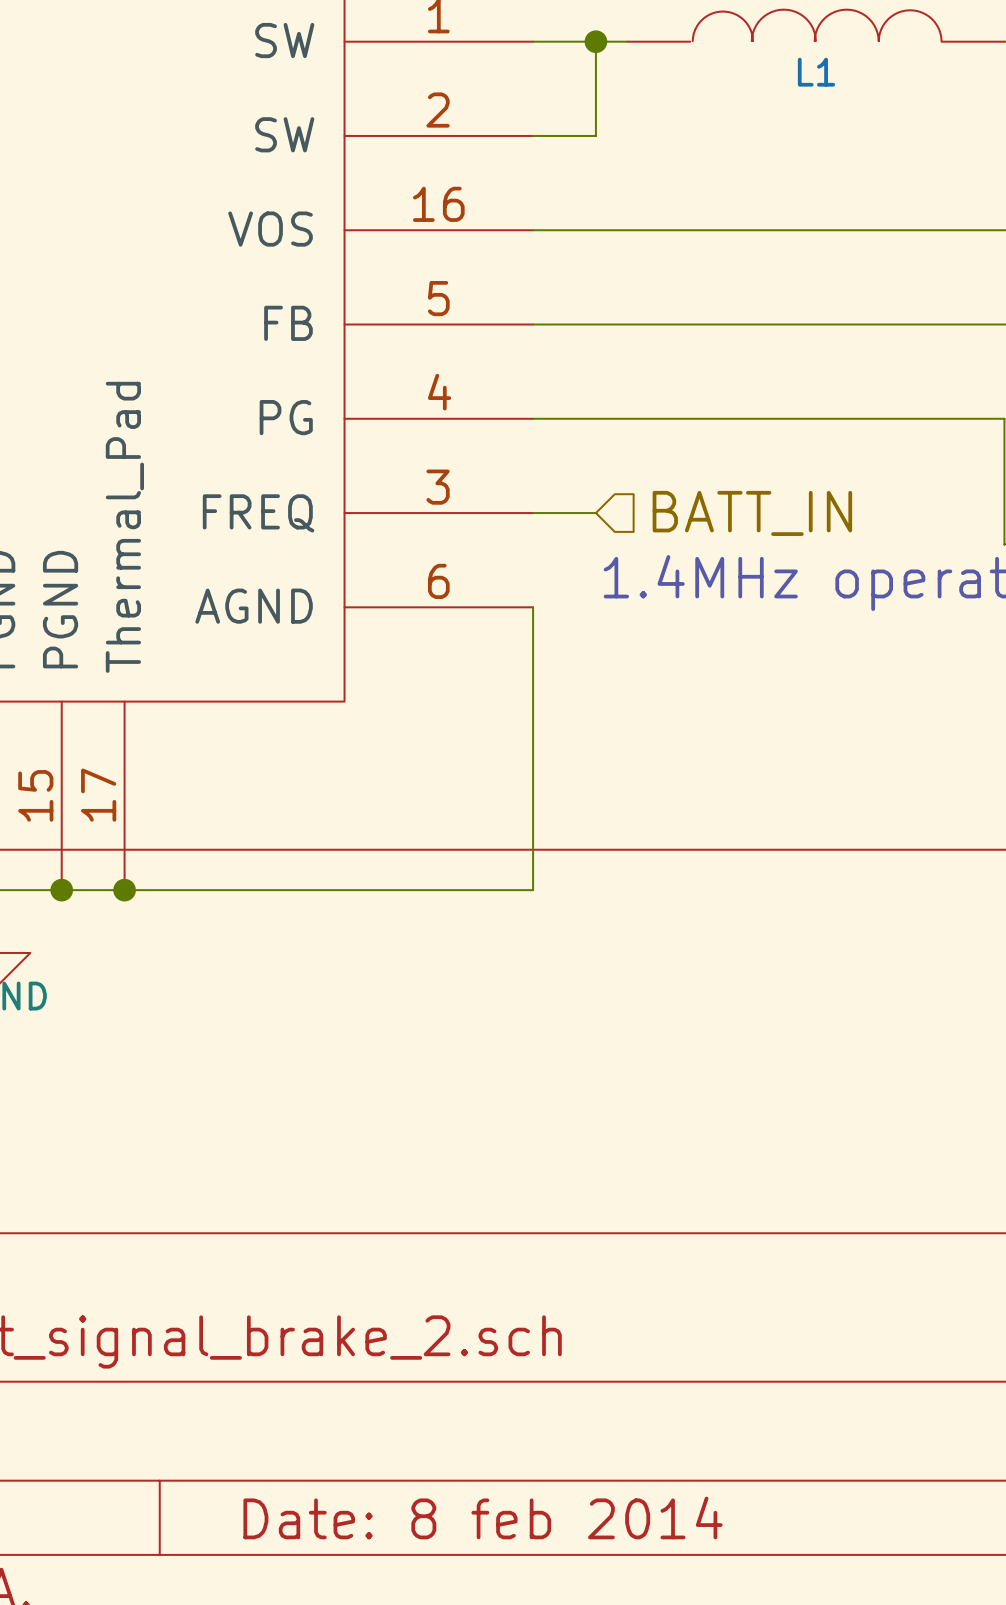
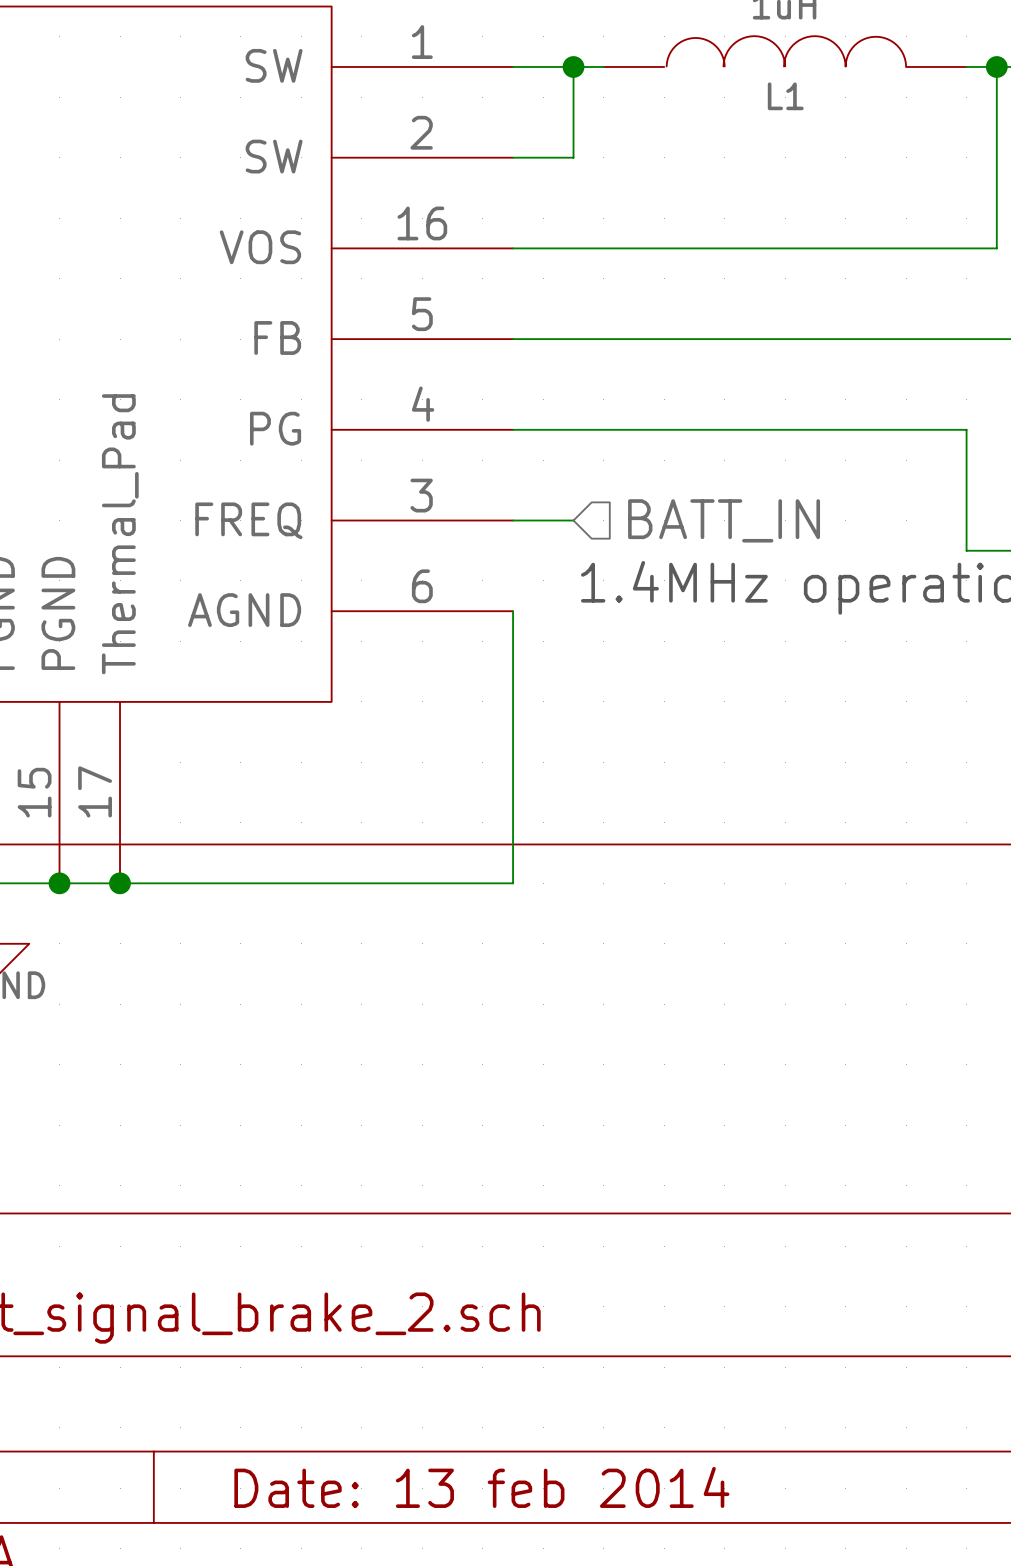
title block: Date: 8 feb 2014 (483, 1518) -> Date: 13 feb 2014 (481, 1487)

